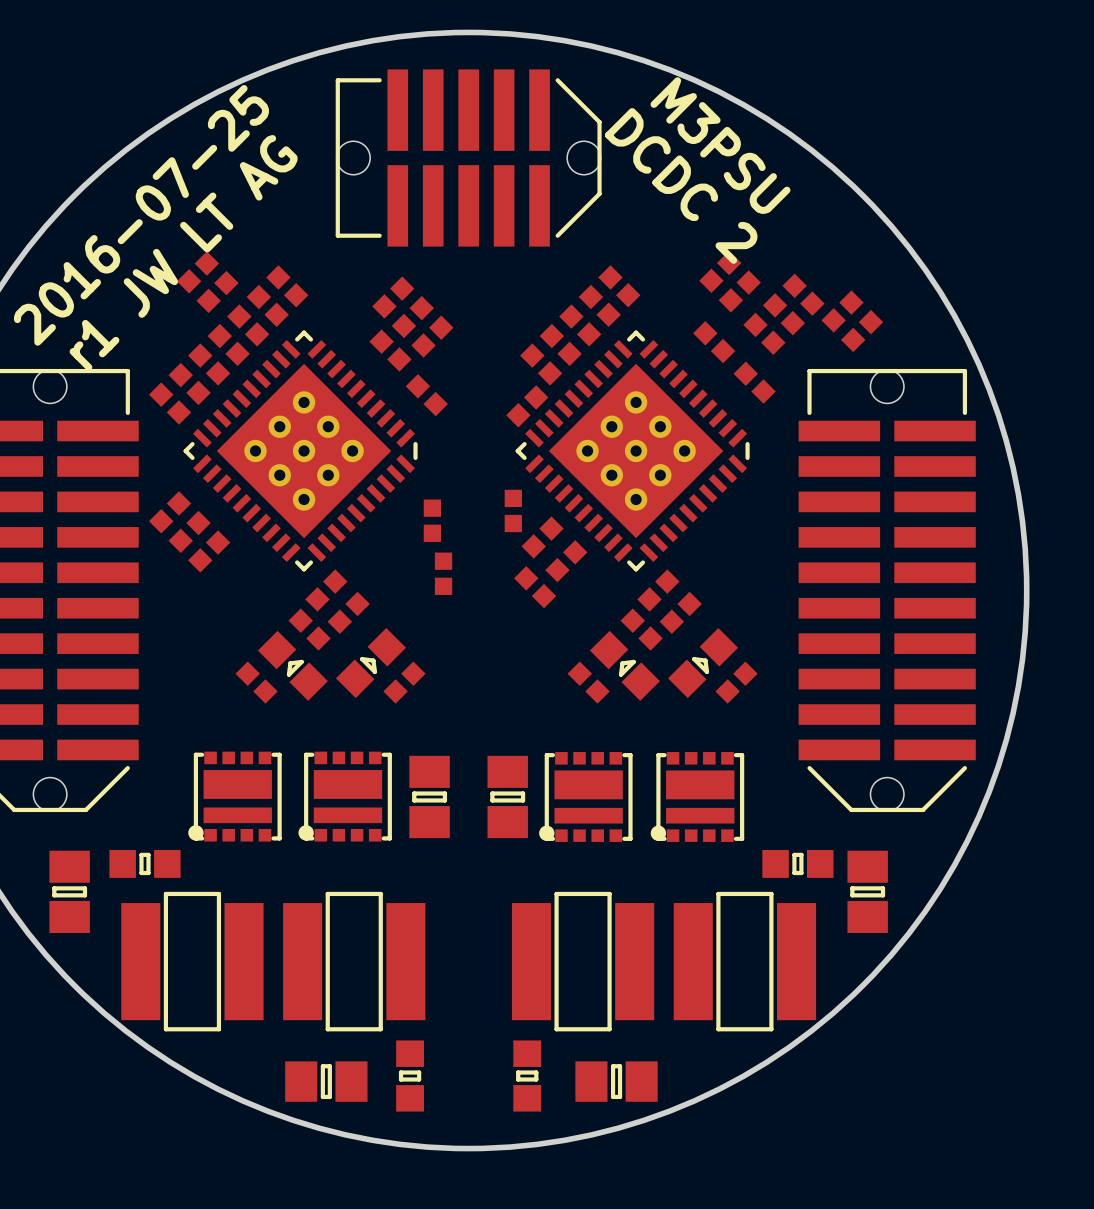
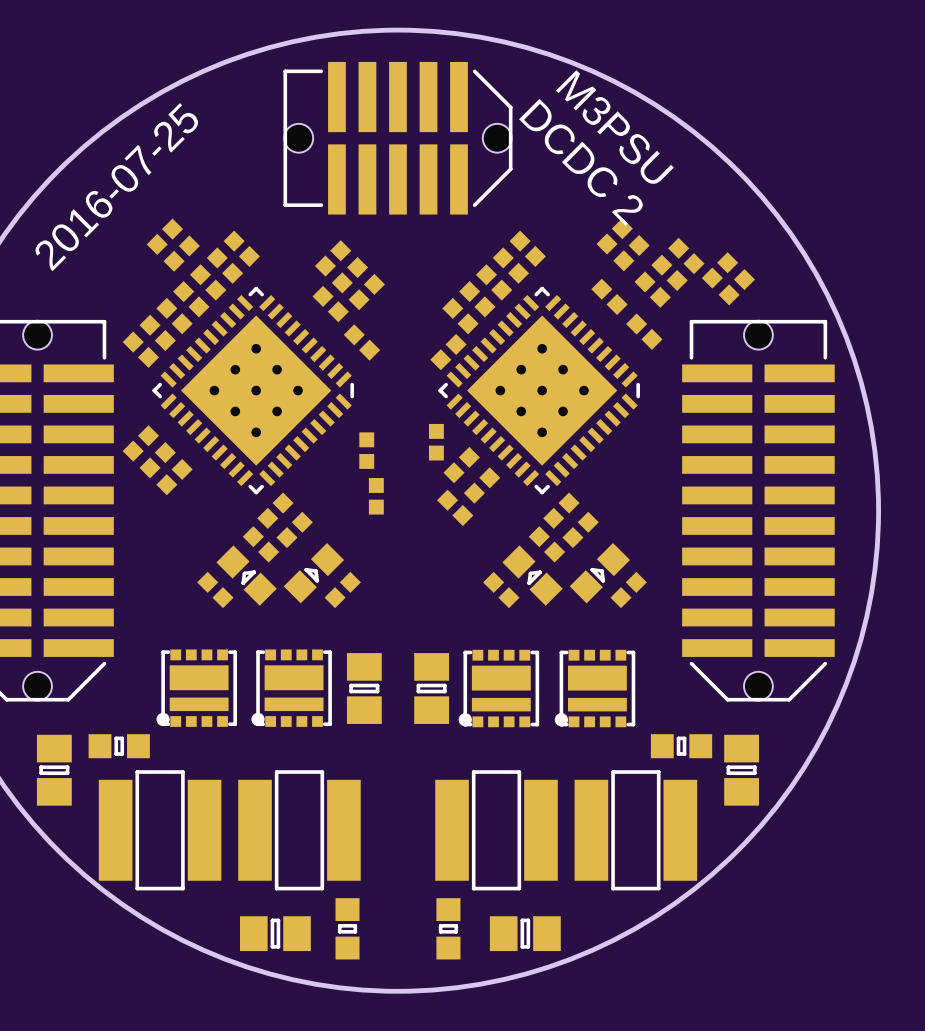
text: r1 JW LT AG (183, 252) -> none

